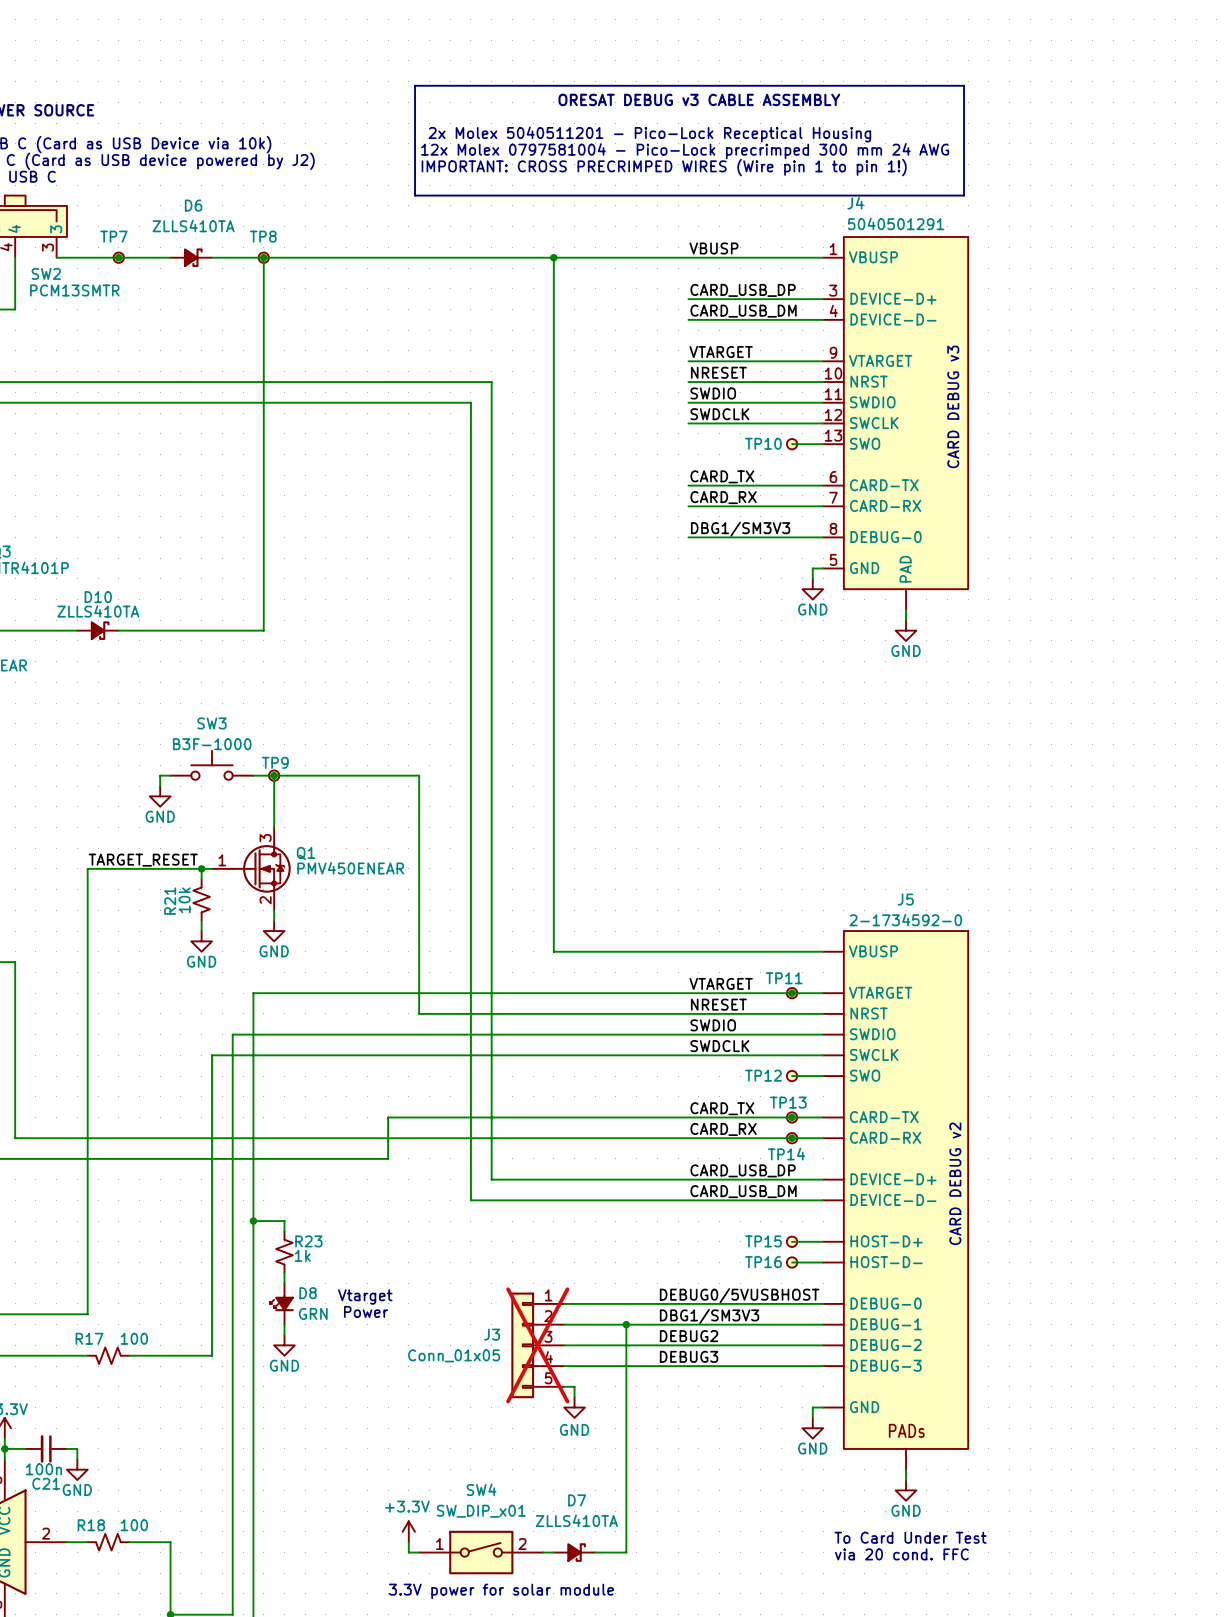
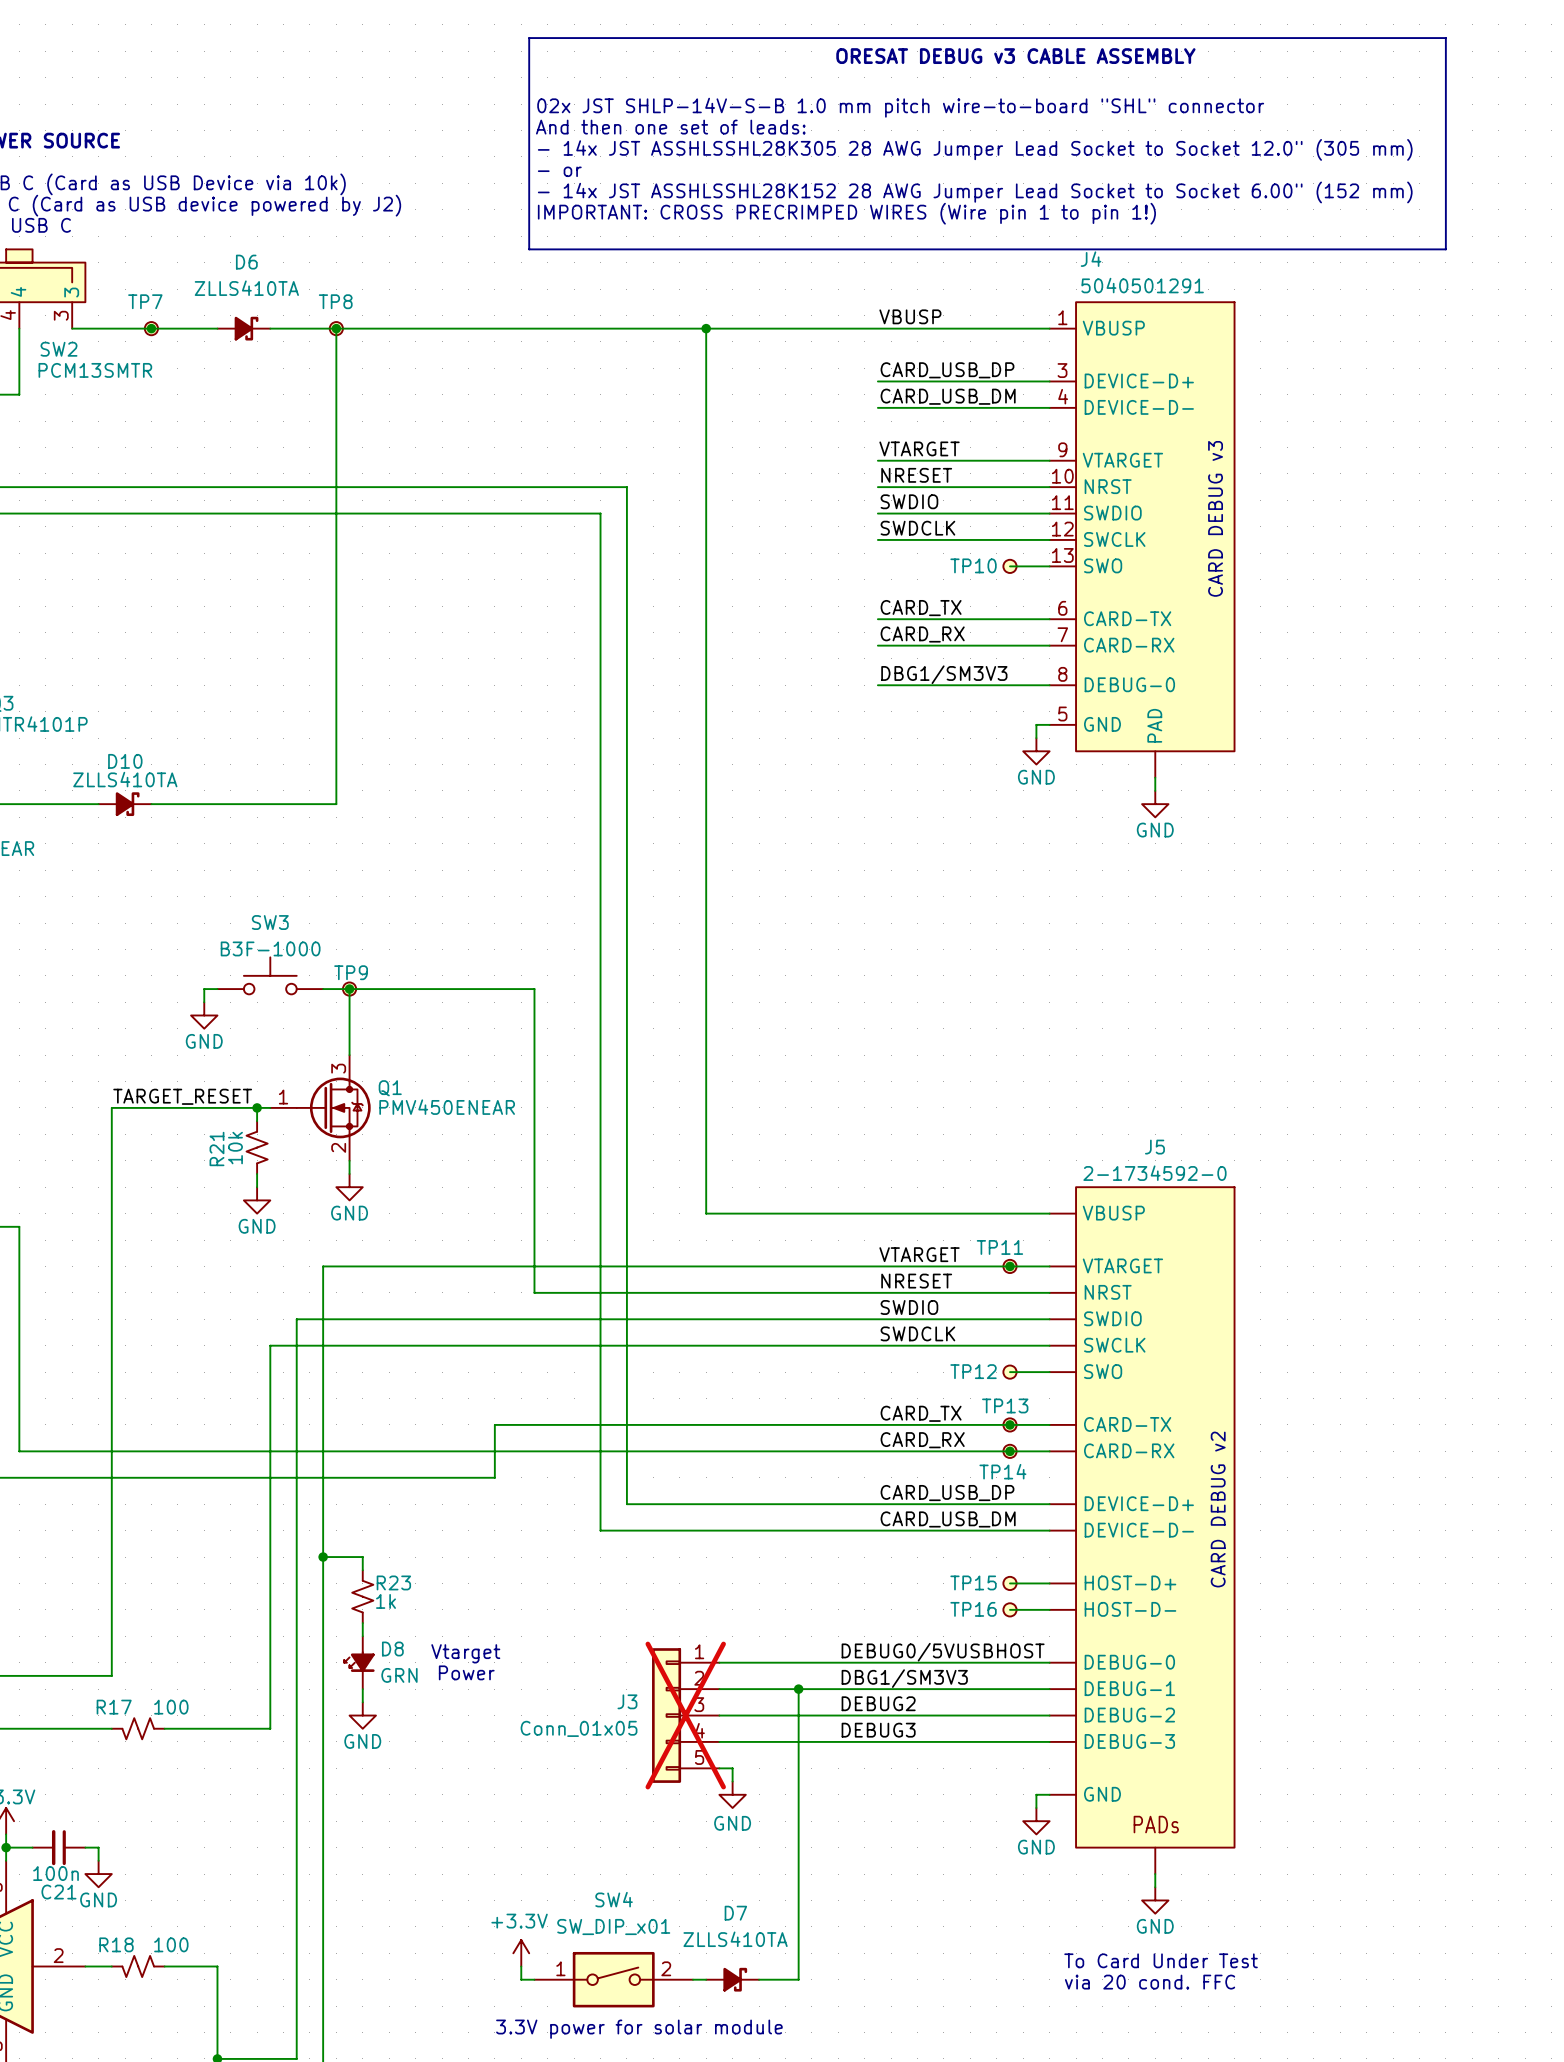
text: none -> 02x JST SHLP-14V-S-B 1.0 mm pitch wire-to-board "SHL" connector (900, 107)
line: (415, 85) (964, 85) (964, 195) -> (529, 109) (529, 38) (1445, 38) (1445, 249) (1229, 249)
text: none -> And then one set of leads: (670, 127)
text position: ORESAT DEBUG v3 CABLE ASSEMBLY (699, 99) -> ORESAT DEBUG v3 CABLE ASSEMBLY (1015, 56)
text: none -> - 14x JST ASSHLSSHL28K305 28 AWG Jumper Lead Socket to Socket 12.0" (305 mm) (975, 149)
text: 2x Molex 5040511201 - Pico-Lock Receptical Housing (649, 134) -> - or (559, 171)
text: 12x Molex 0797581004 - Pico-Lock precrimped 300 mm 24 AWG (685, 151) -> - 14x JST ASSHLSSHL28K152 28 AWG Jumper Lead Socket to Socket 6.00" (152 mm) (975, 192)

